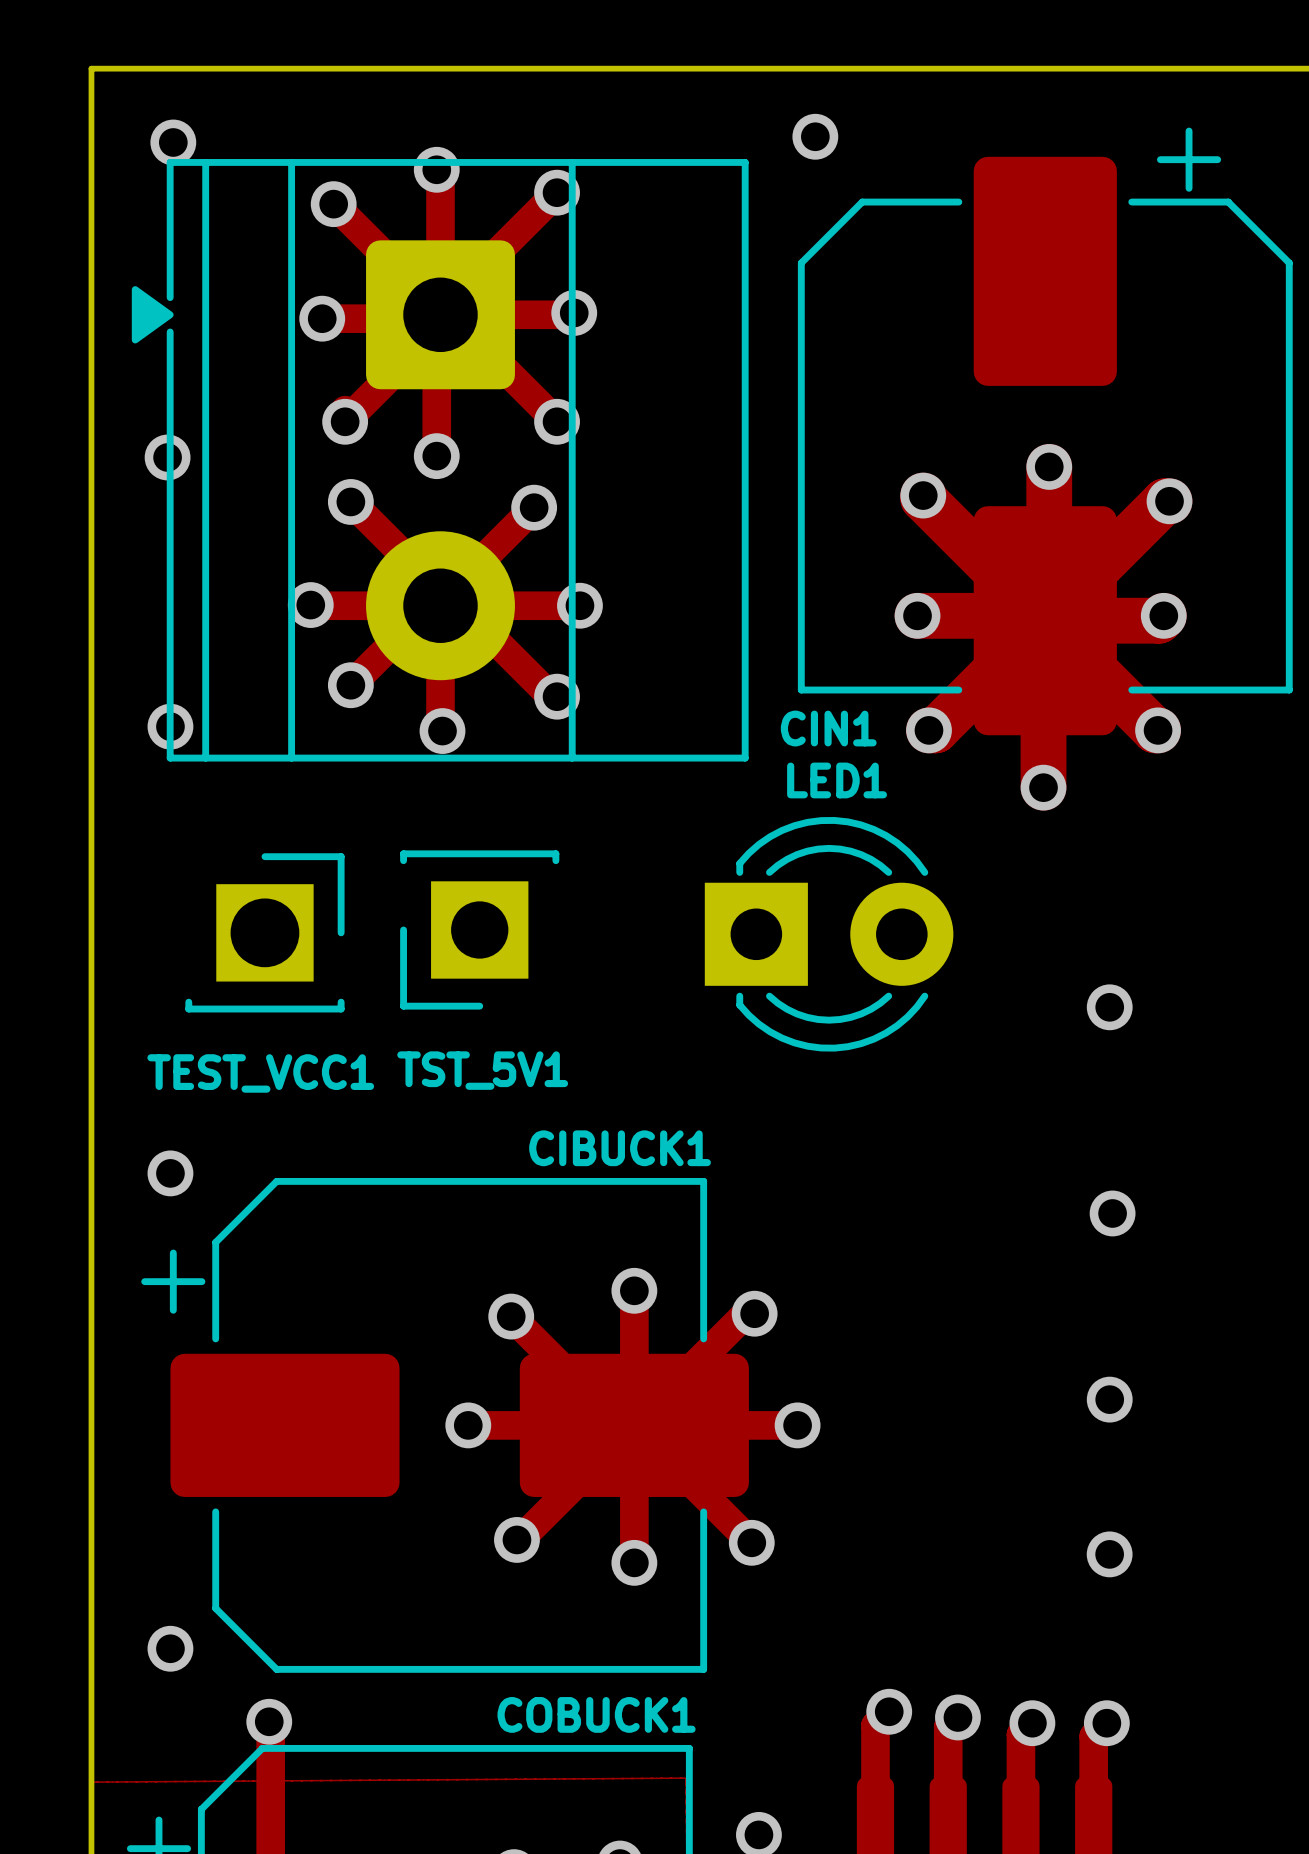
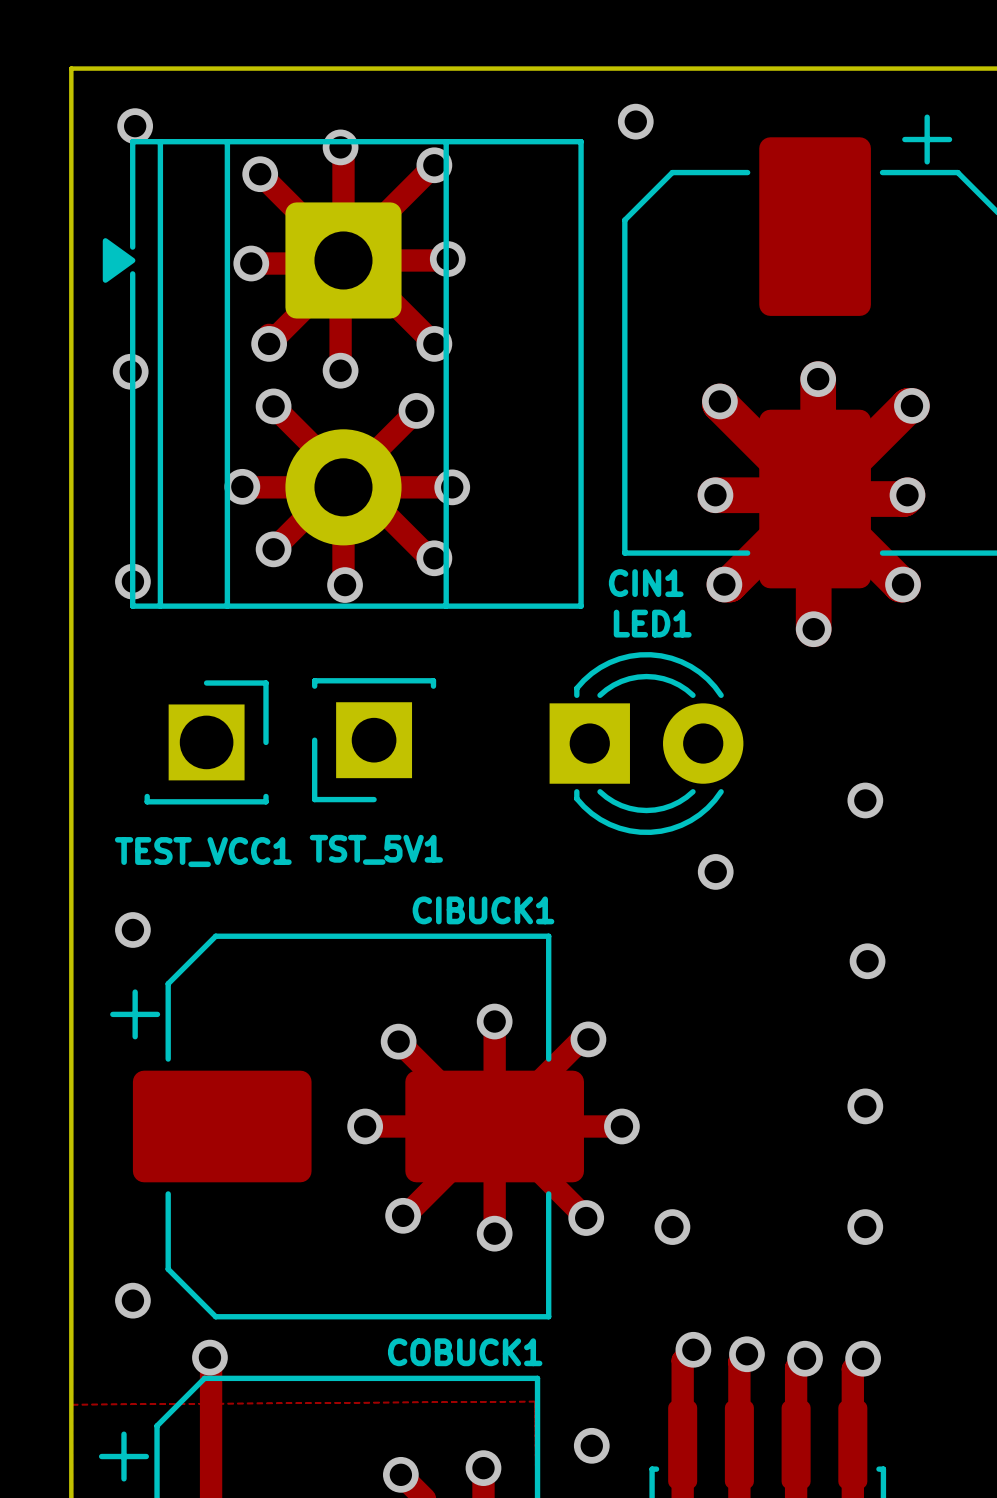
via: none -> (715, 871)
via: none -> (672, 1227)

